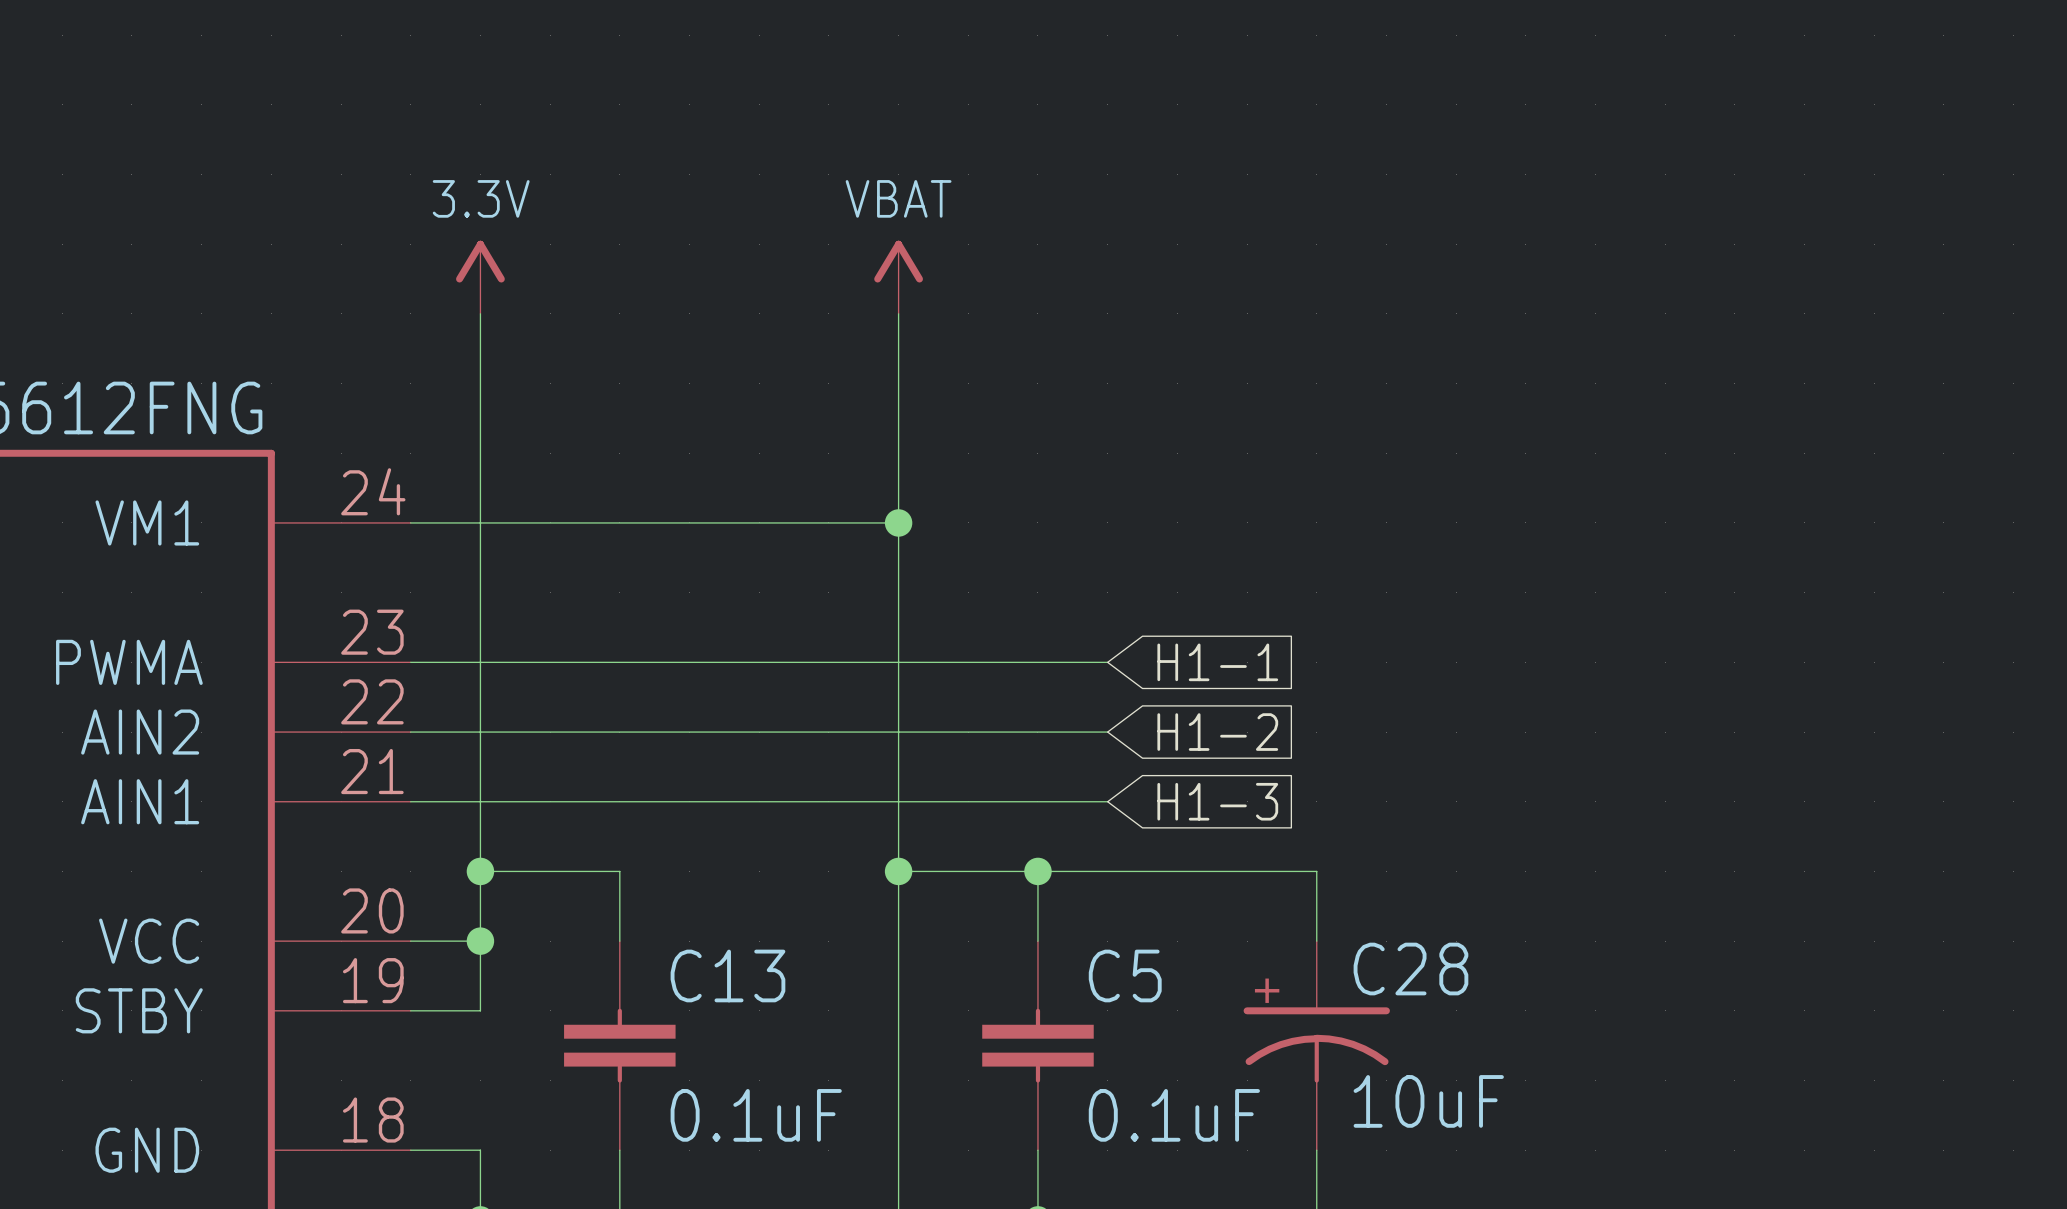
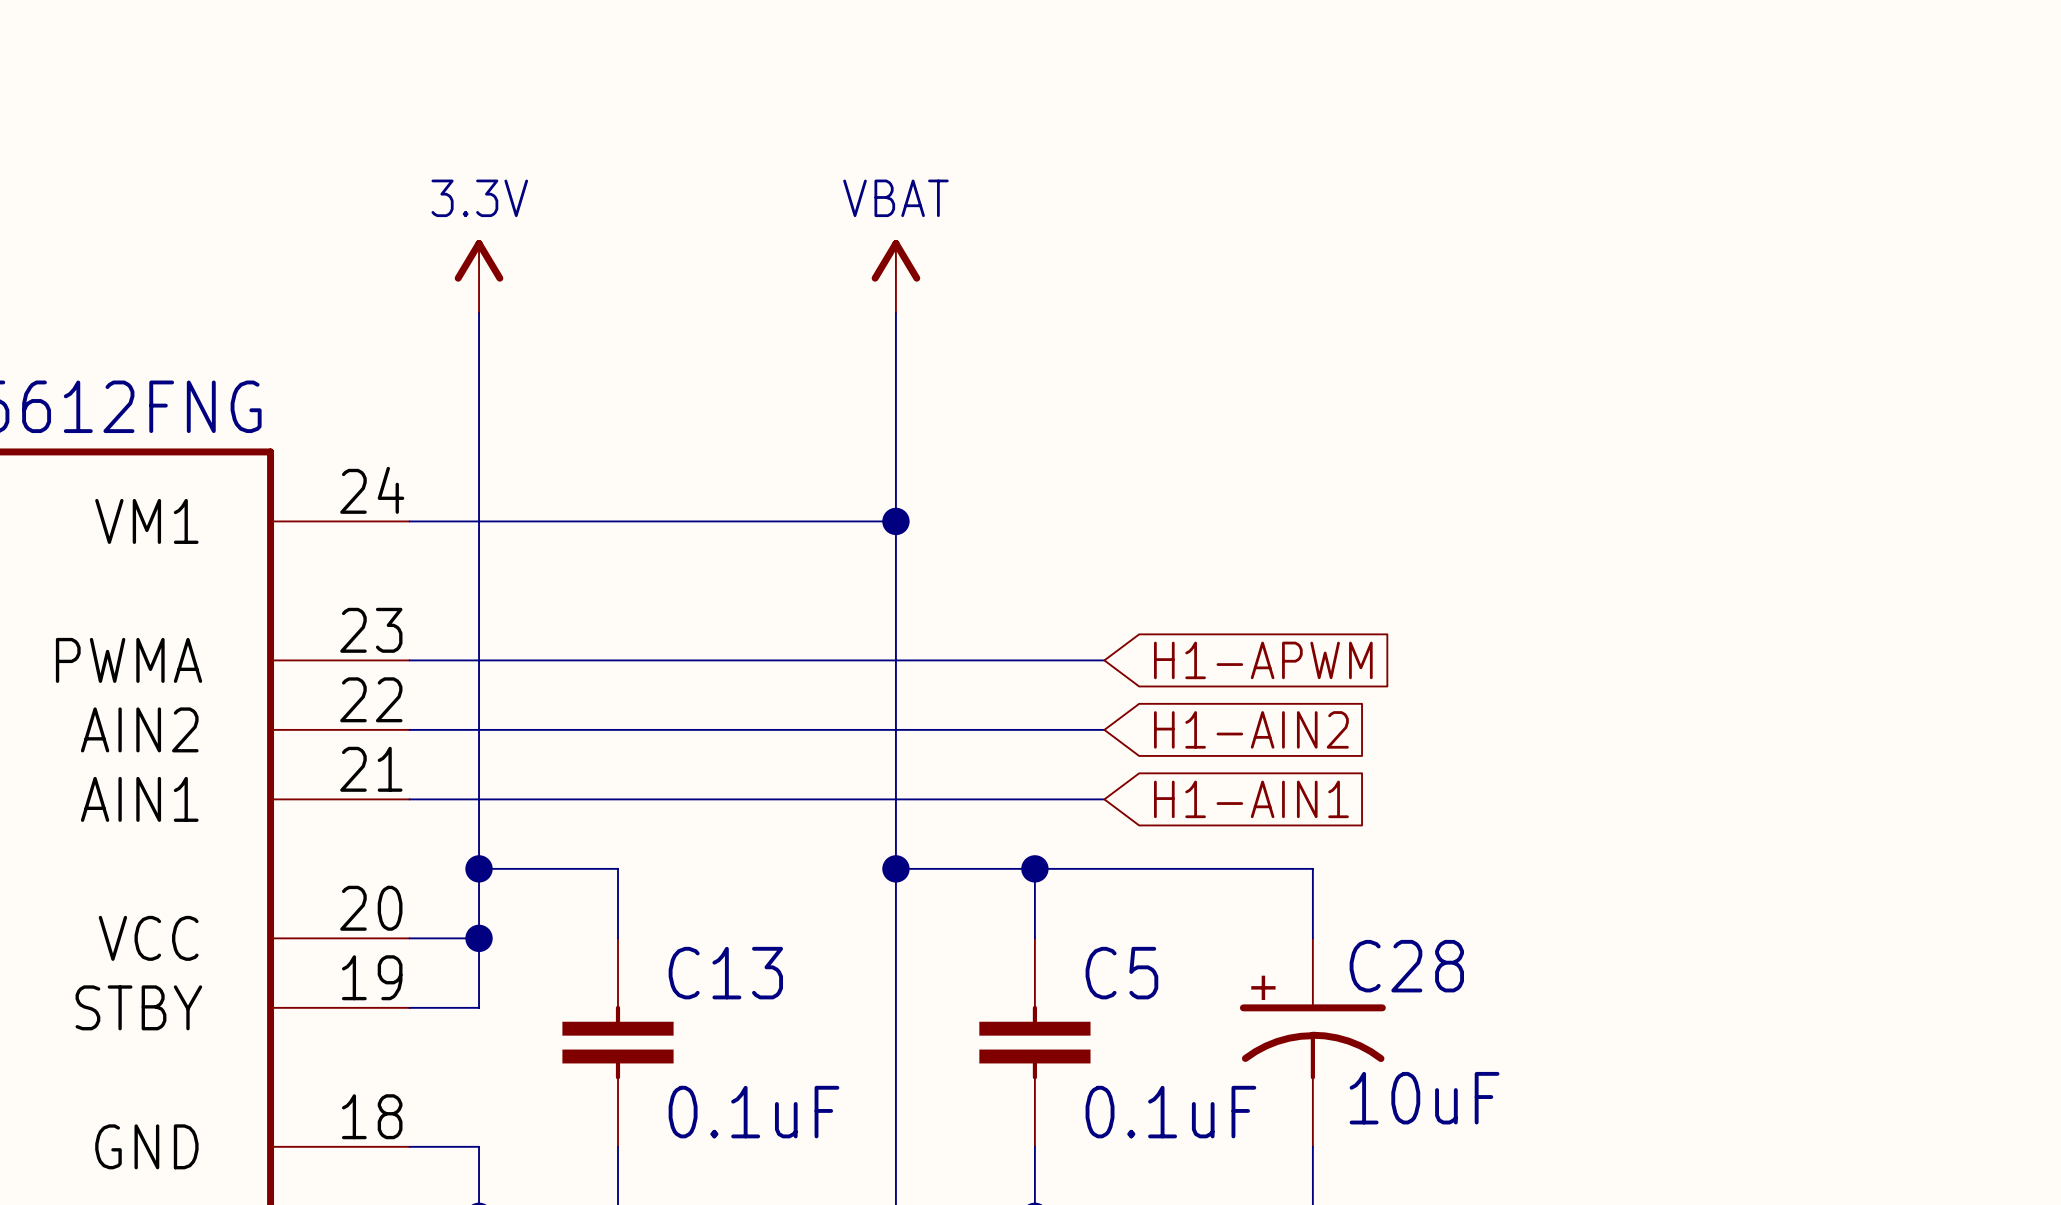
global label: H1-1 (1217, 662) -> H1-APWM (1263, 660)
global label: H1-2 (1217, 732) -> H1-AIN2 (1251, 729)
global label: H1-3 (1217, 801) -> H1-AIN1 (1251, 799)

